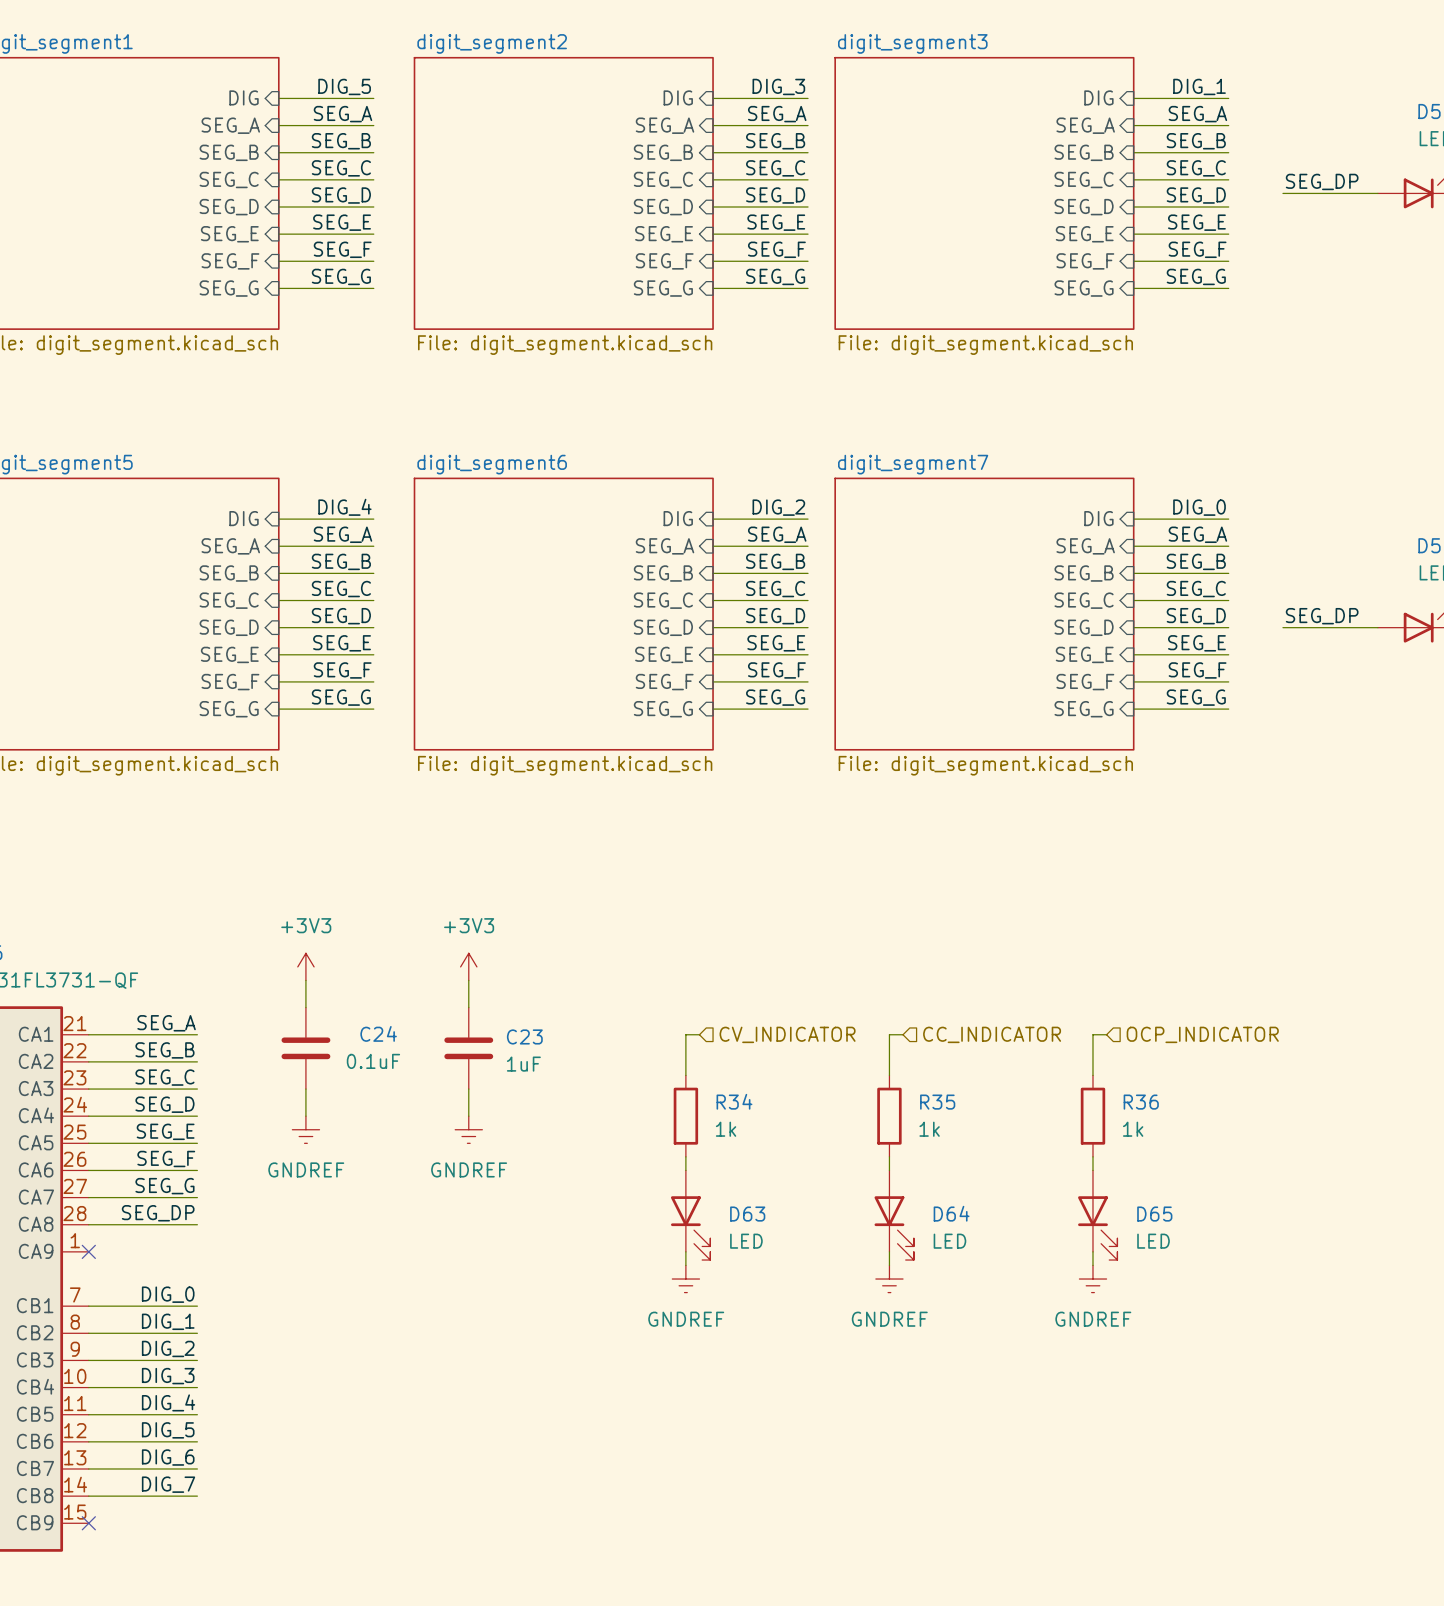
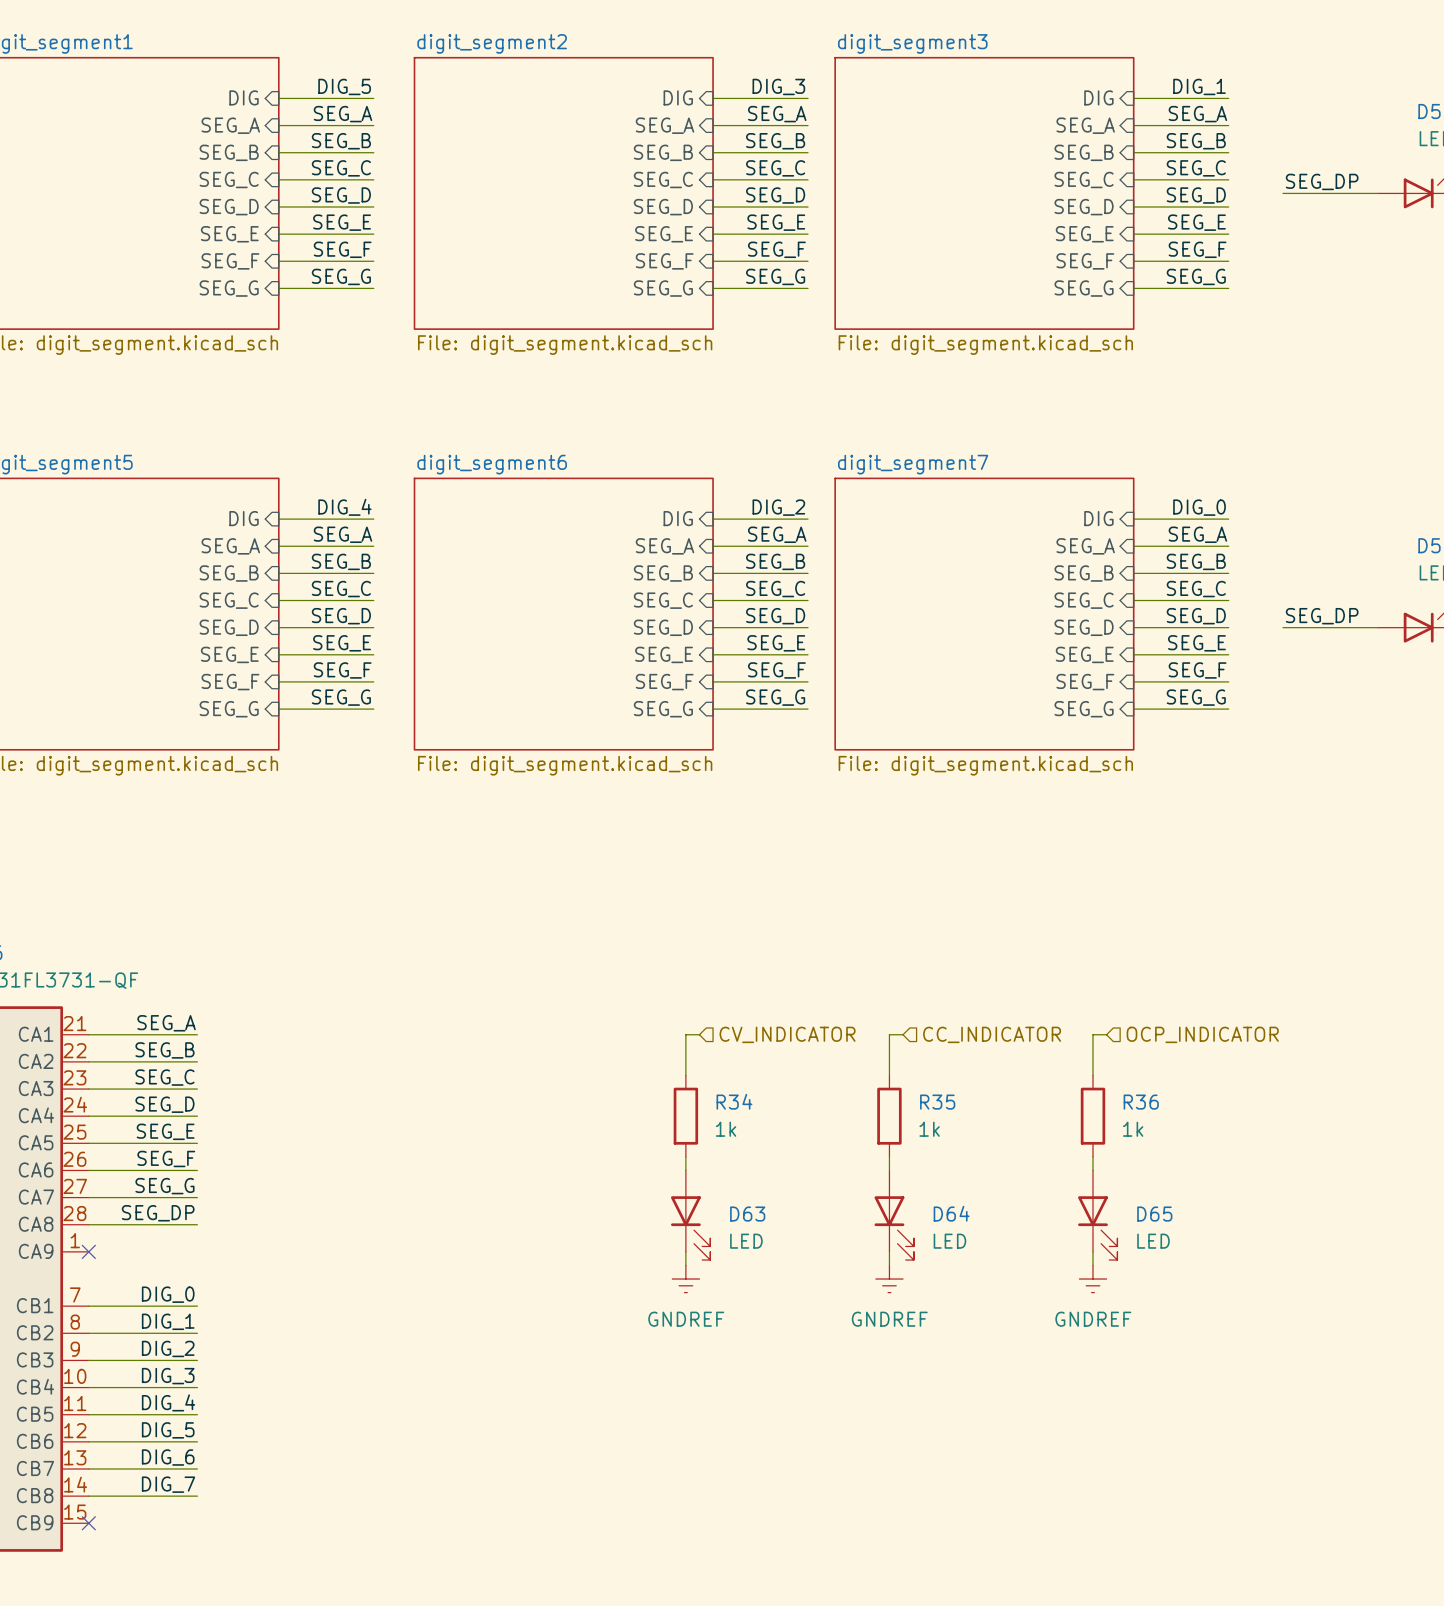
power symbol: +3V3 (305, 966) -> none
power symbol: +3V3 (468, 966) -> none
wire: (305, 980) (305, 1007) -> none
wire: (468, 980) (468, 1007) -> none
C24: 0.1uF (305, 1048) -> none
C23: 1uF (468, 1048) -> none
wire: (305, 1089) (305, 1116) -> none
wire: (468, 1089) (468, 1116) -> none
power symbol: GNDREF (305, 1129) -> none
power symbol: GNDREF (468, 1129) -> none

